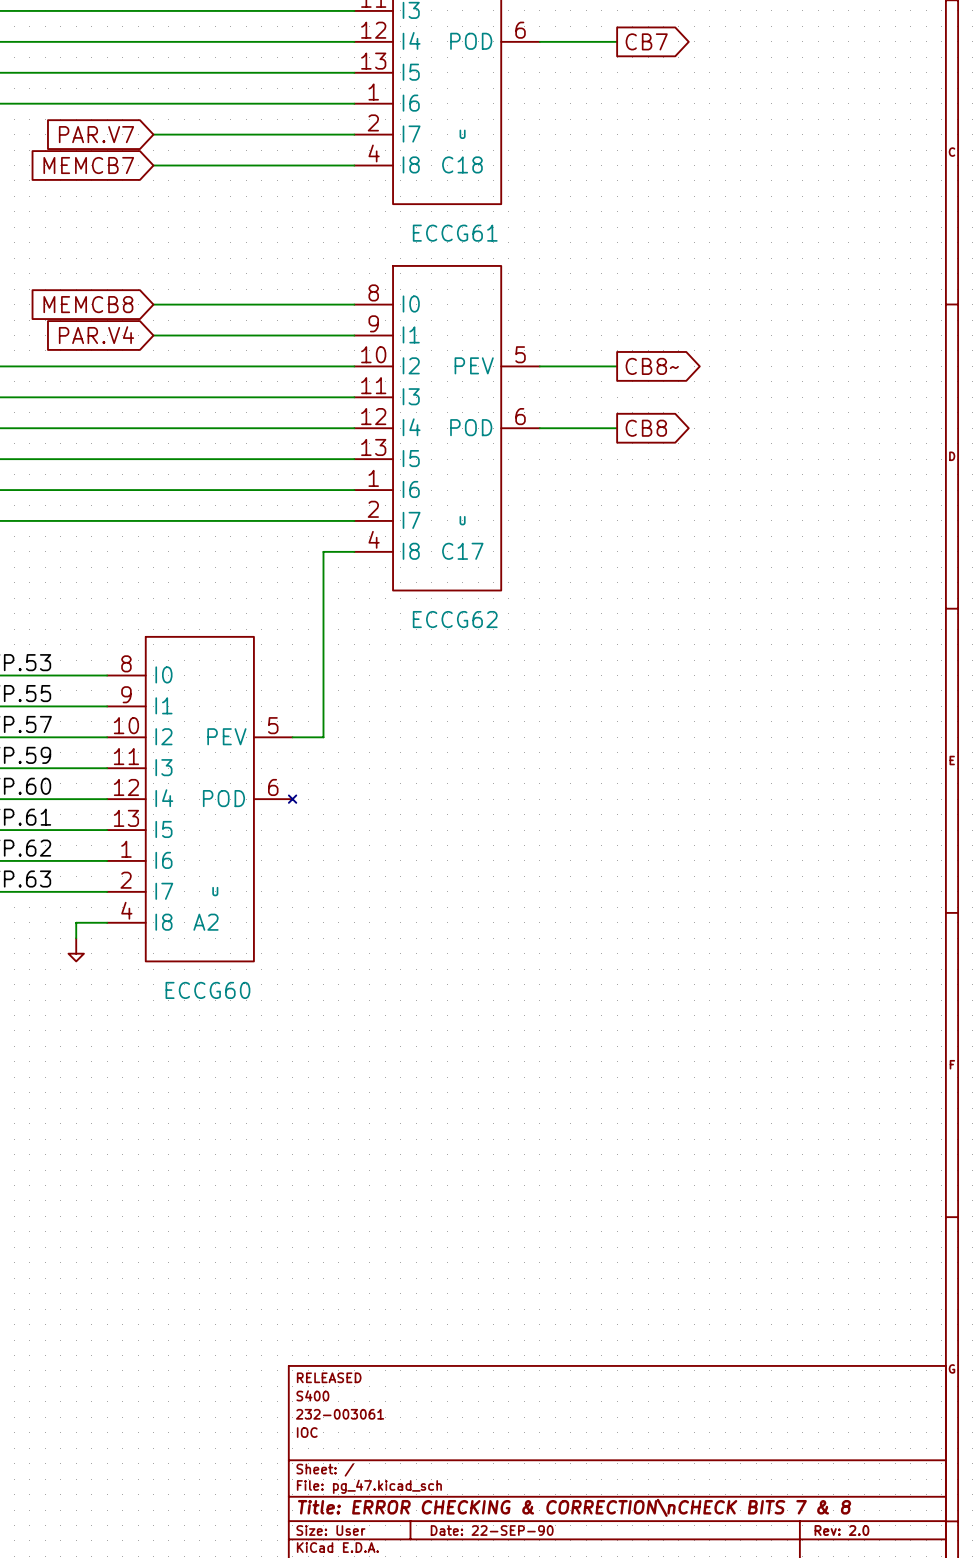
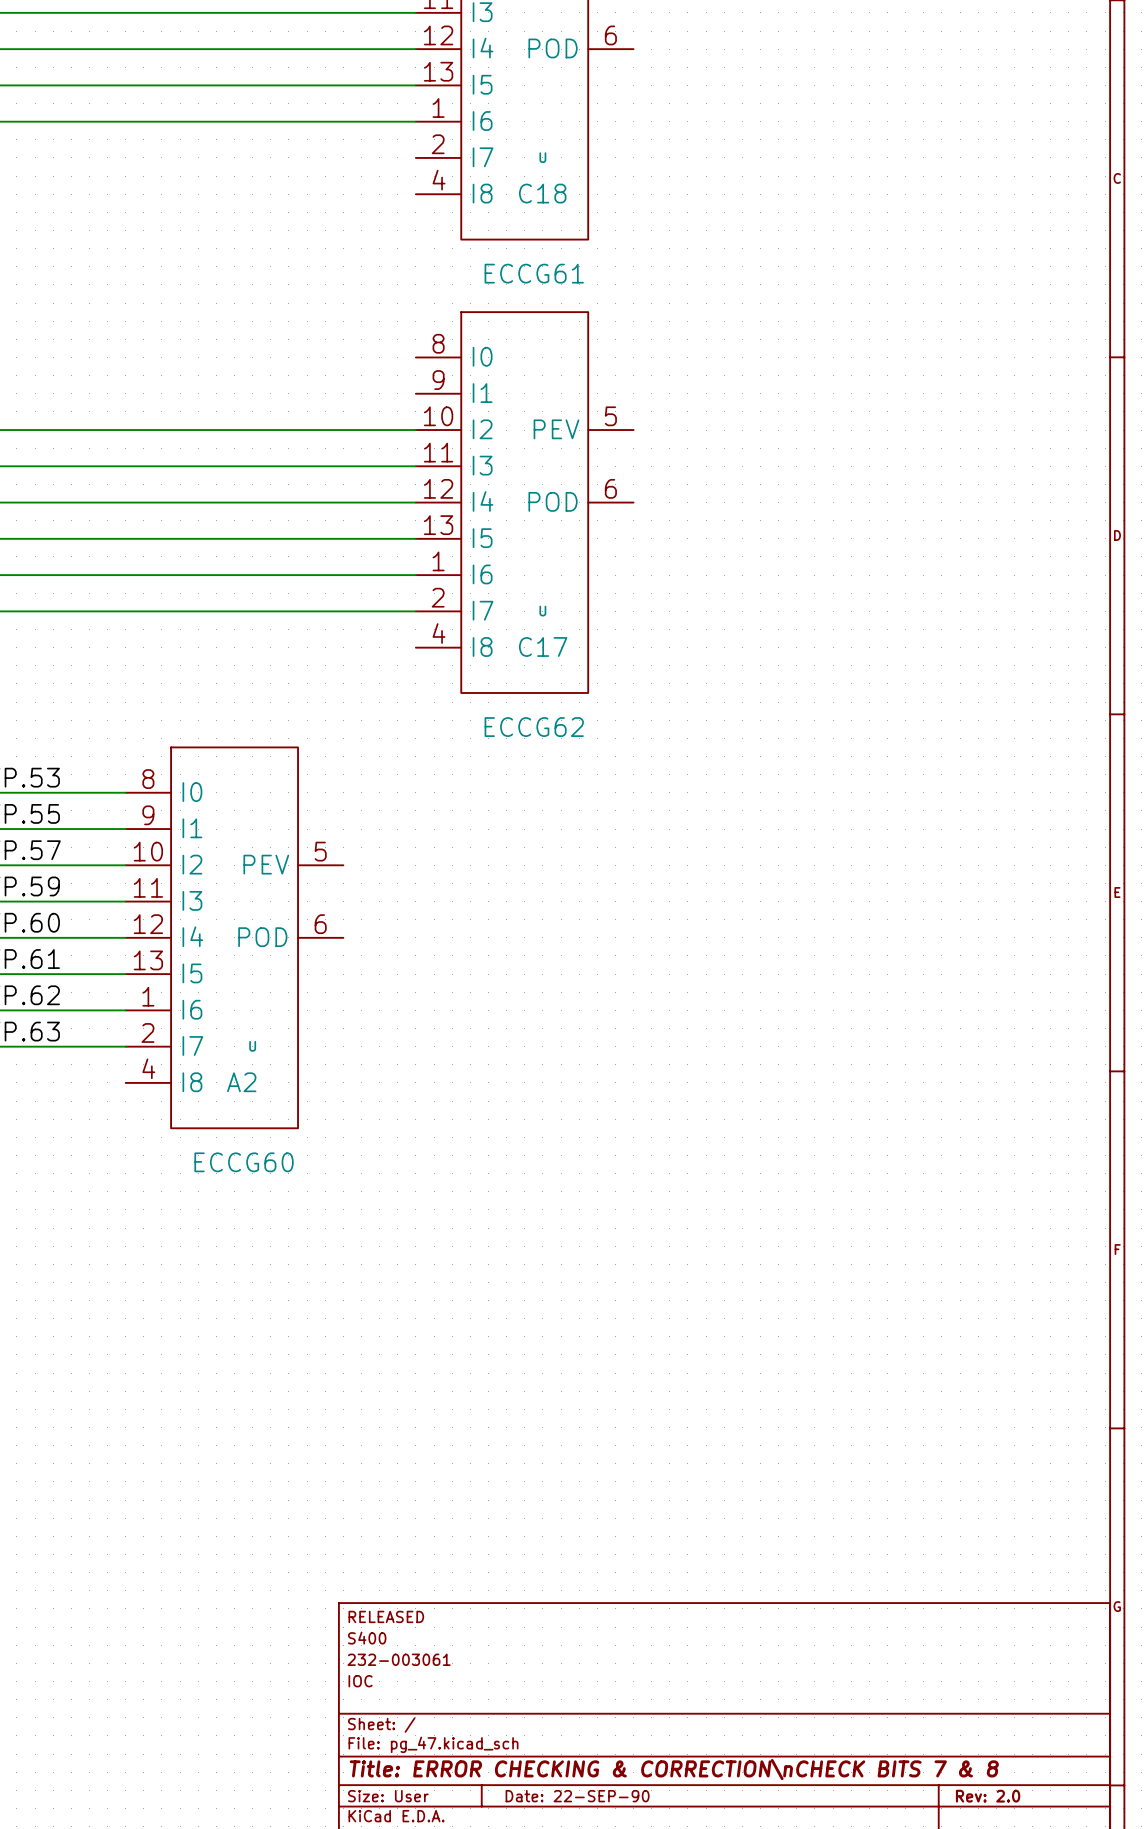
wire: (539, 41) (617, 41) -> none
global label: CB7 (646, 41) -> none
global label: PAR.V7 (96, 134) -> none
wire: (153, 134) (354, 134) -> none
global label: MEMCB7 (88, 165) -> none
wire: (153, 165) (354, 165) -> none
global label: MEMCB8 (88, 304) -> none
wire: (153, 304) (354, 304) -> none
global label: PAR.V4 (96, 335) -> none
wire: (153, 335) (354, 335) -> none
wire: (539, 366) (617, 366) -> none
global label: CB8~ (652, 366) -> none
wire: (539, 428) (617, 428) -> none
global label: CB8 (646, 428) -> none
wire: (354, 551) (323, 551) (323, 737) (292, 737) -> none
no-connect mark: (292, 799) -> none
wire: (107, 922) (76, 922) (76, 938) -> none
power symbol: (76, 950) -> none

